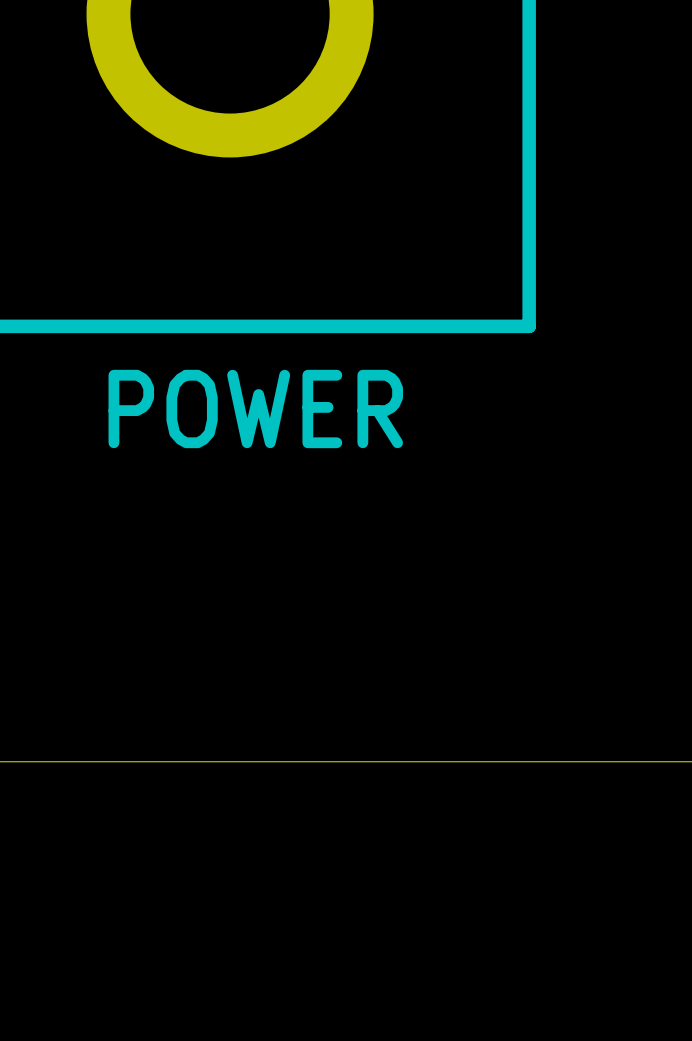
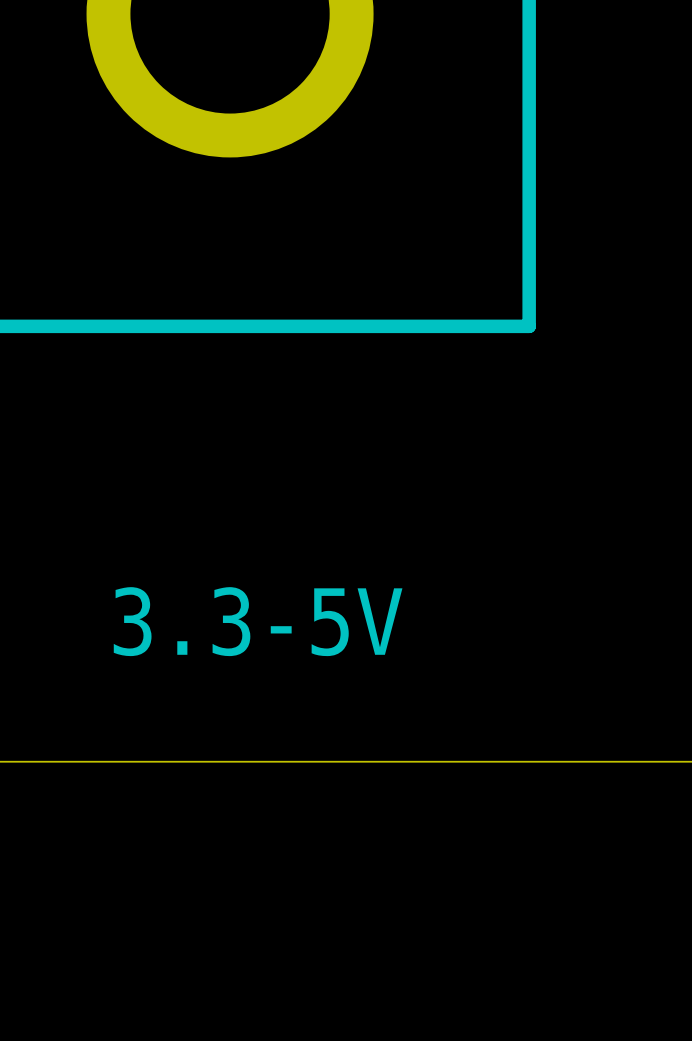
POWER name: POWER (255, 408) -> 3.3-5V (258, 621)

